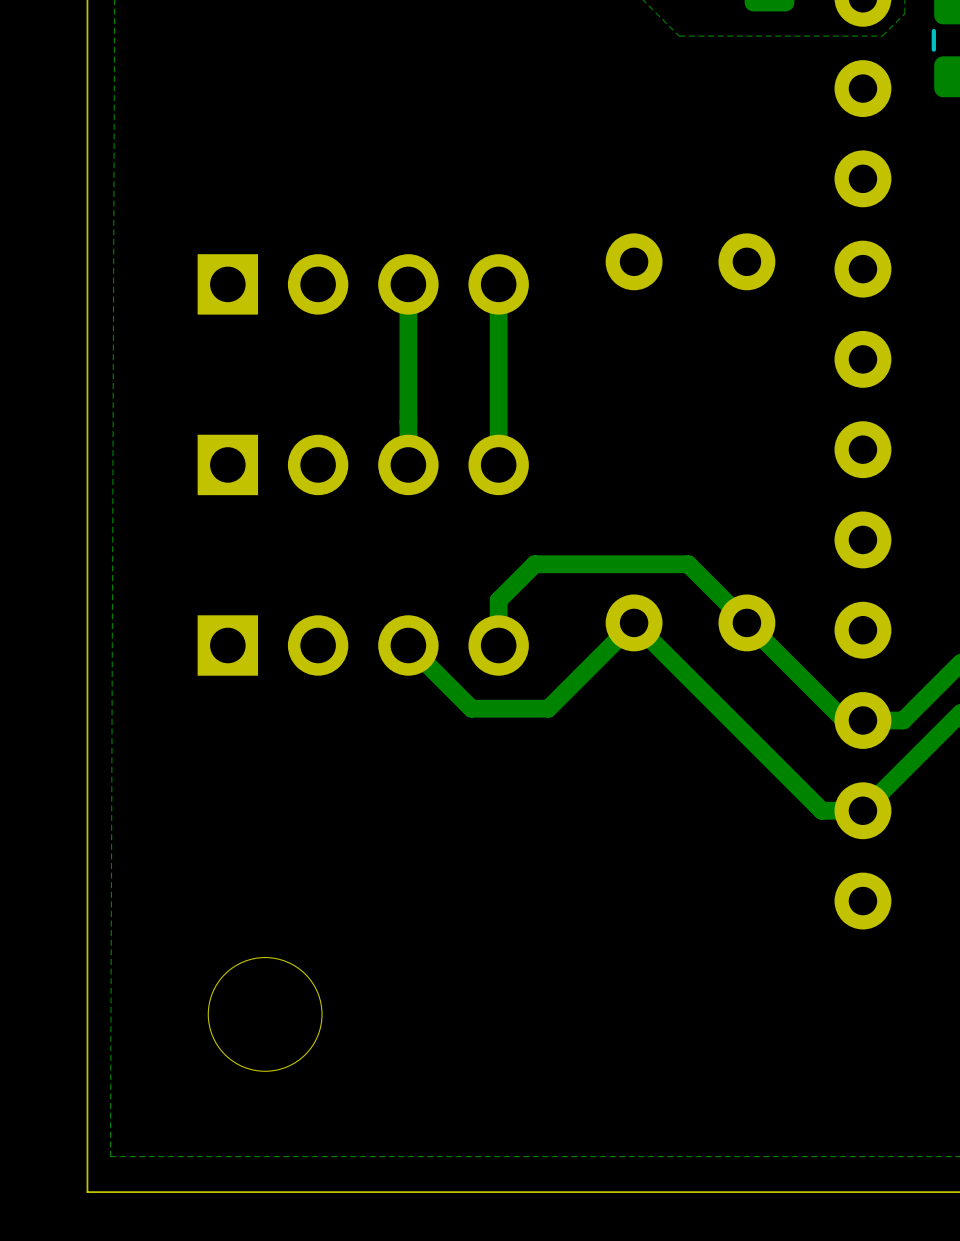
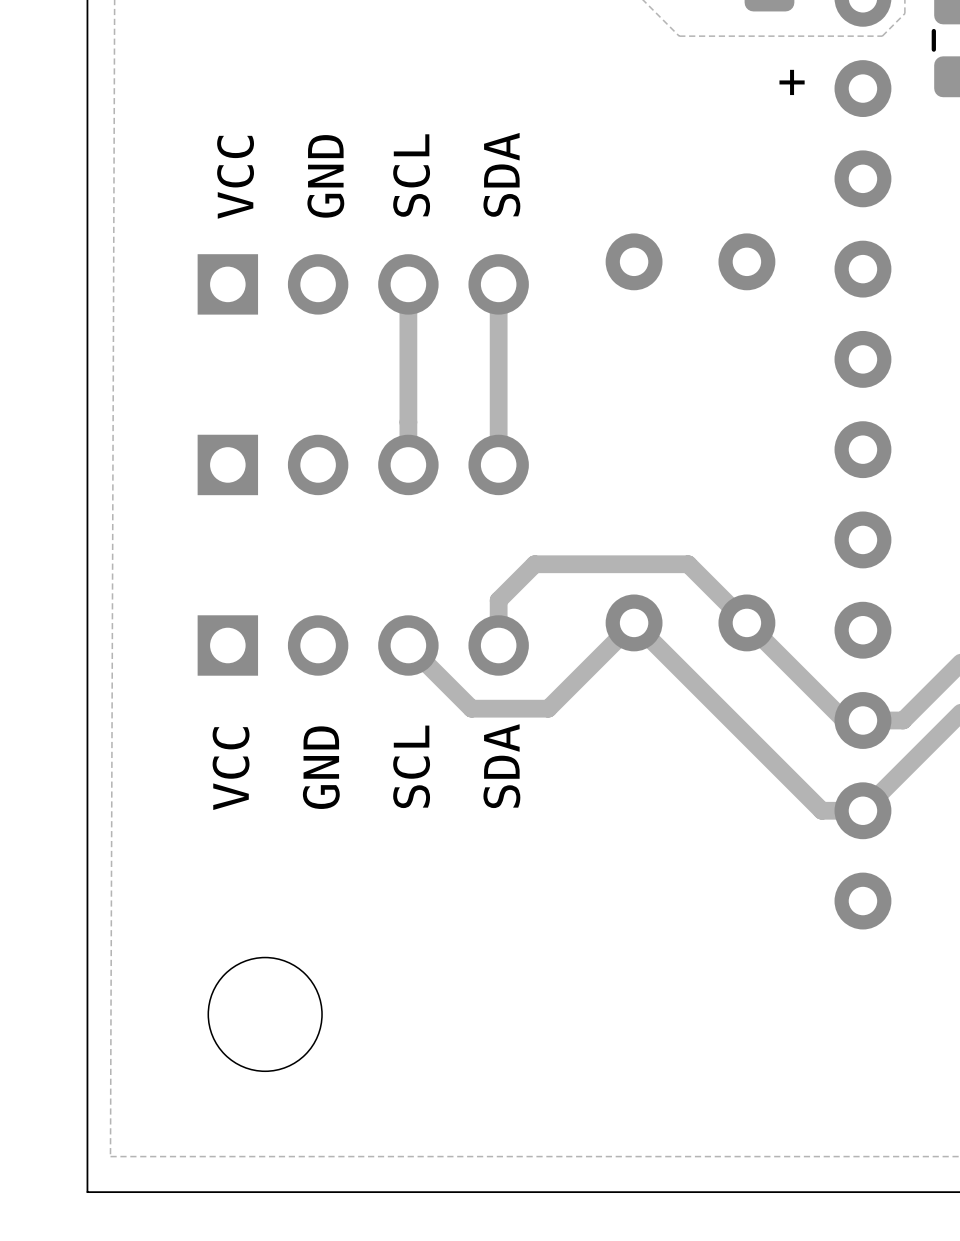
text: none -> + (792, 82)
text: none -> SCL (411, 175)
text: none -> SDA (501, 174)
text: none -> GND (325, 176)
text: none -> VCC (235, 177)
text: none -> SCL (411, 766)
text: none -> SDA (501, 766)
text: none -> GND (321, 767)
text: none -> VCC (231, 768)

